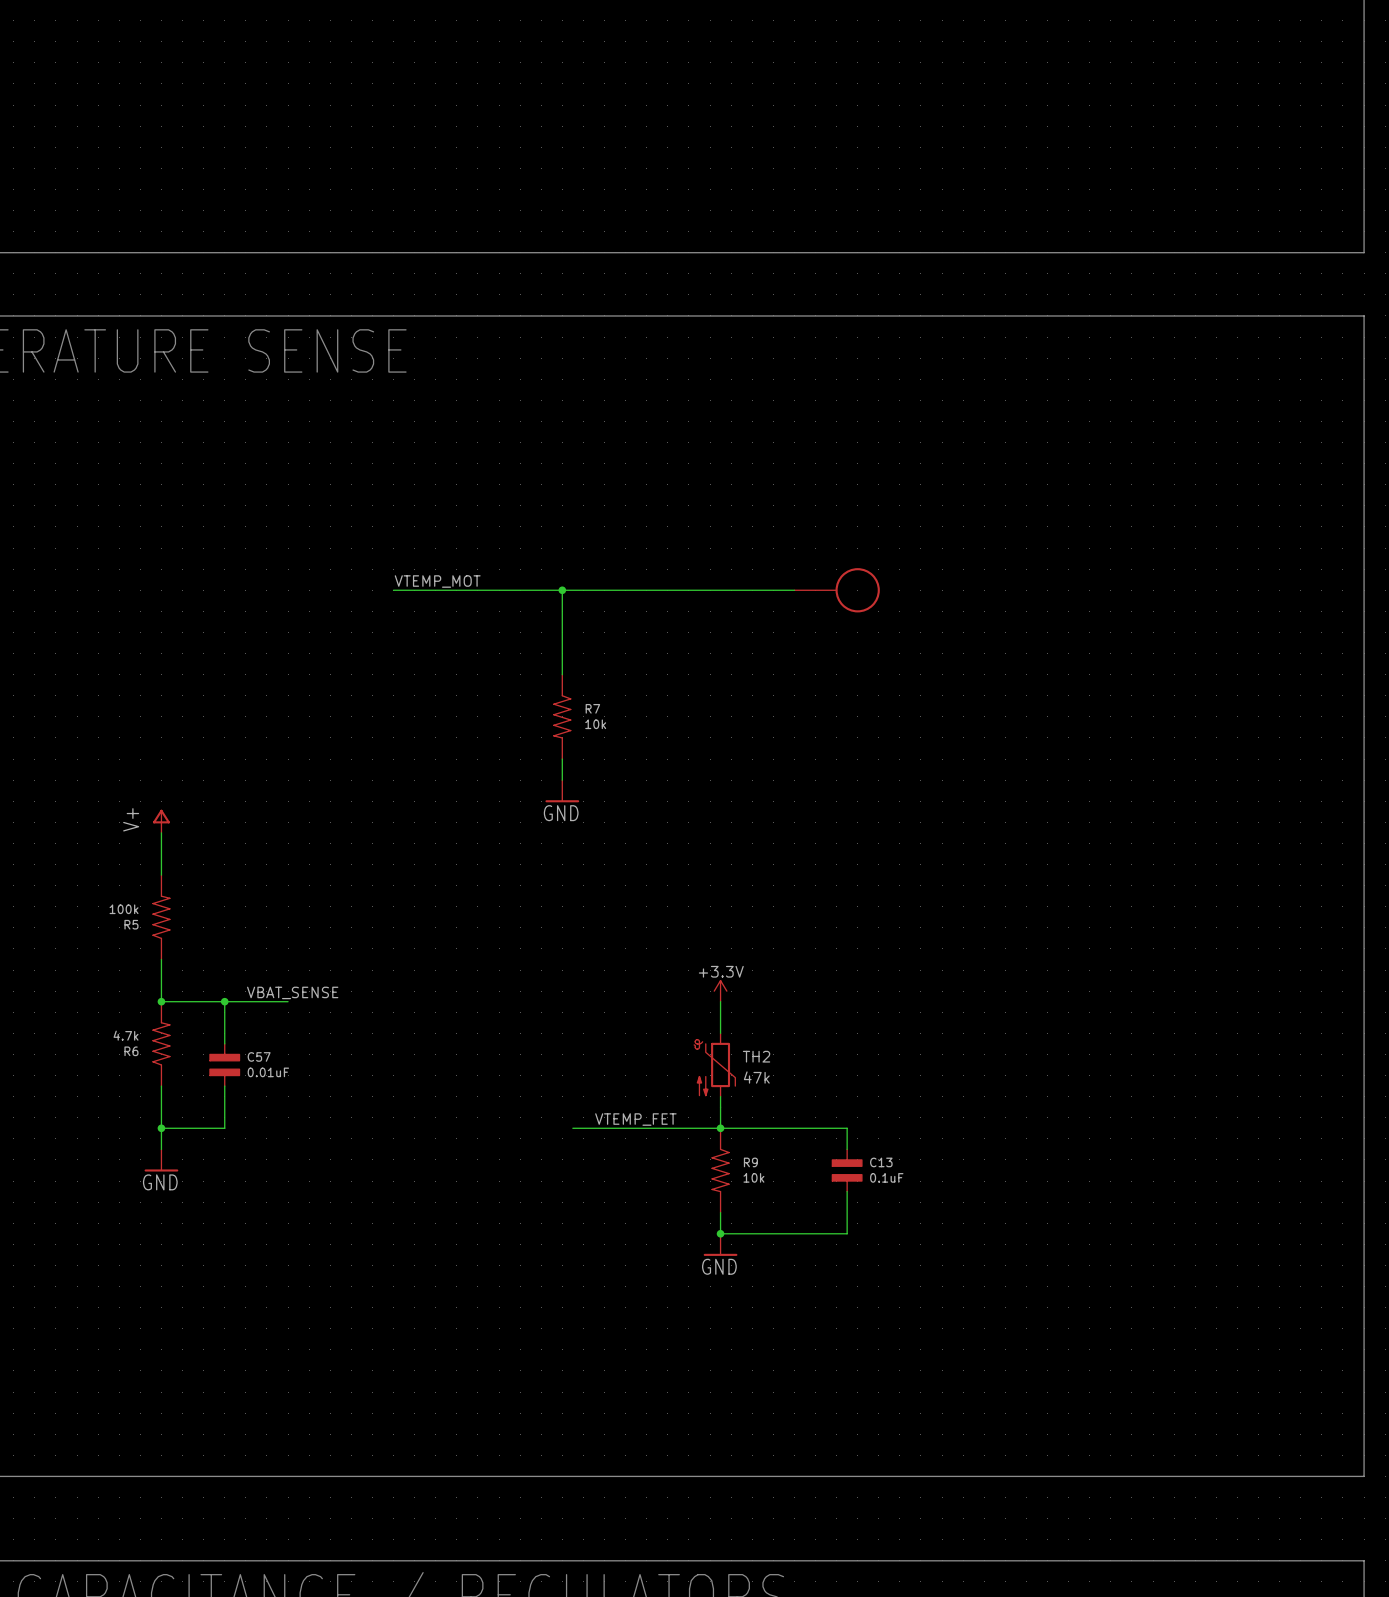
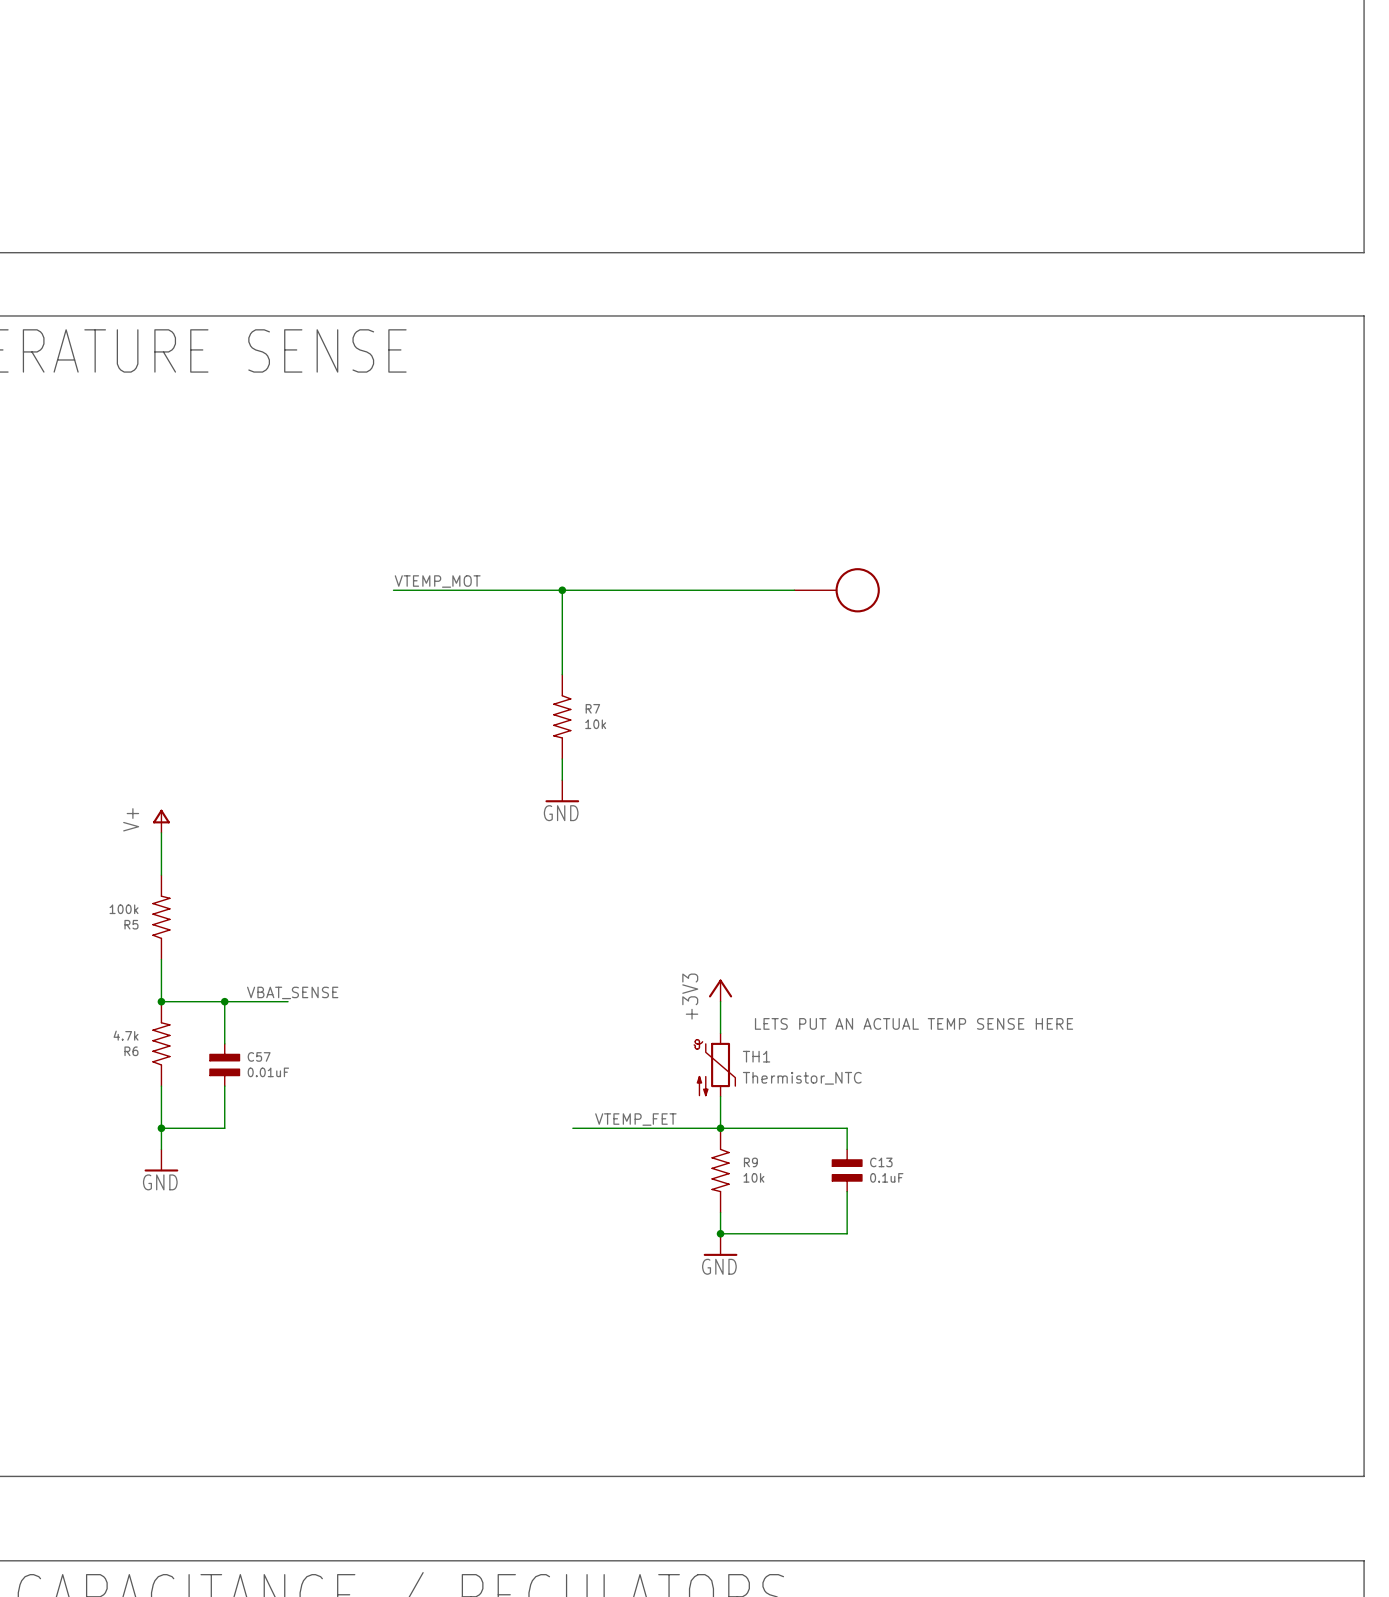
power symbol: +3.3V (720, 991) -> +3V3 (720, 990)
label: none -> LETS PUT AN ACTUAL TEMP SENSE HERE (914, 1023)
TH2 name: TH2 (756, 1056) -> TH1 (756, 1056)
TH2 value: 47k (756, 1077) -> Thermistor_NTC (802, 1078)

